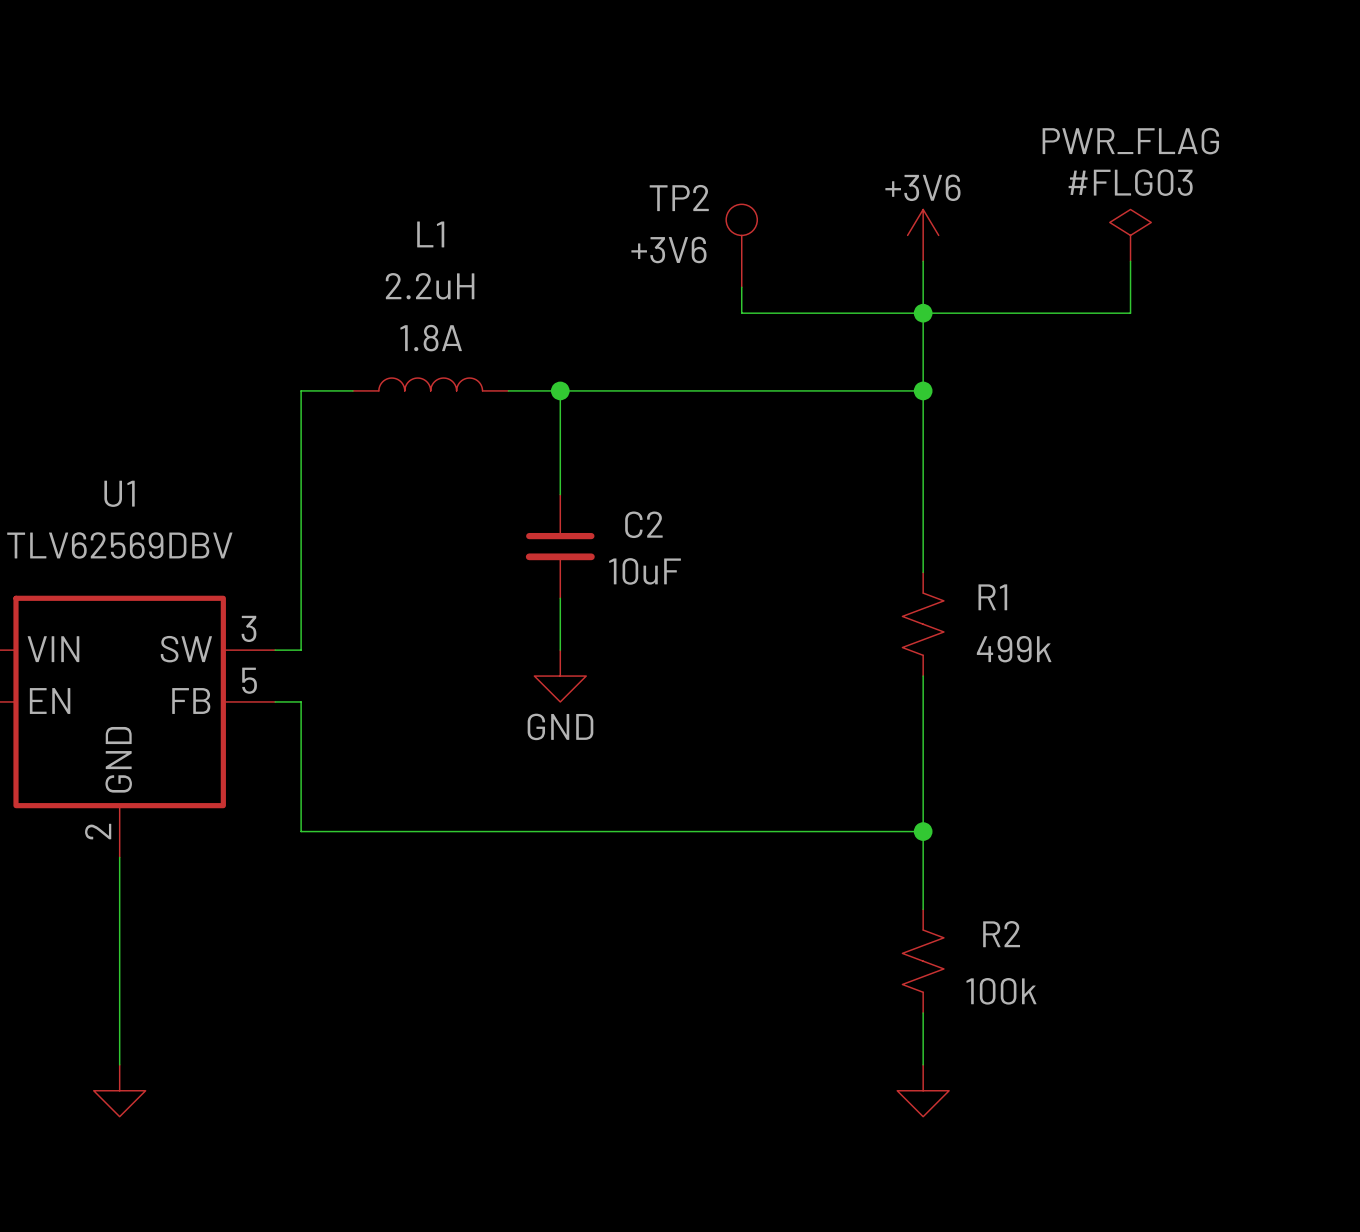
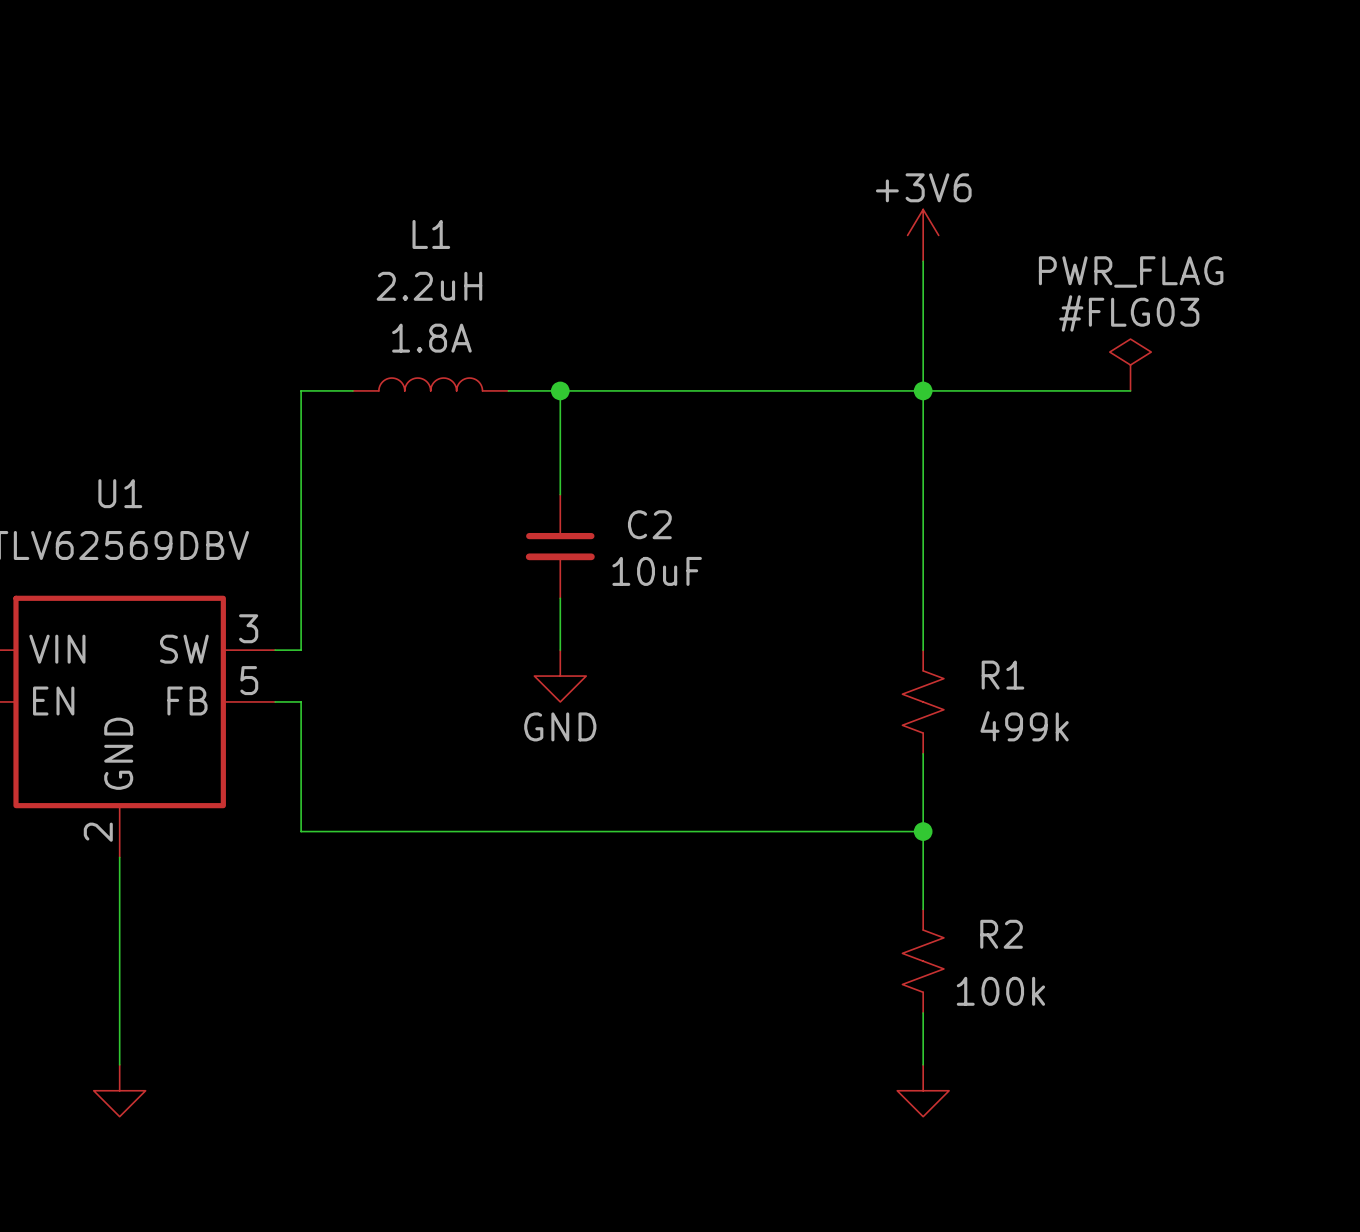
#FLG03 position: PWR_FLAG (1130, 235) -> PWR_FLAG (1130, 365)
TP2: +3V6 (741, 245) -> none
wire: (1130, 261) (1130, 313) (741, 313) (741, 287) -> none
junction: (923, 313) -> none
wire: none -> (923, 390) (1130, 390)
R1 position: (923, 624) -> (923, 701)
wire: (923, 676) (923, 753) -> (923, 572) (923, 650)

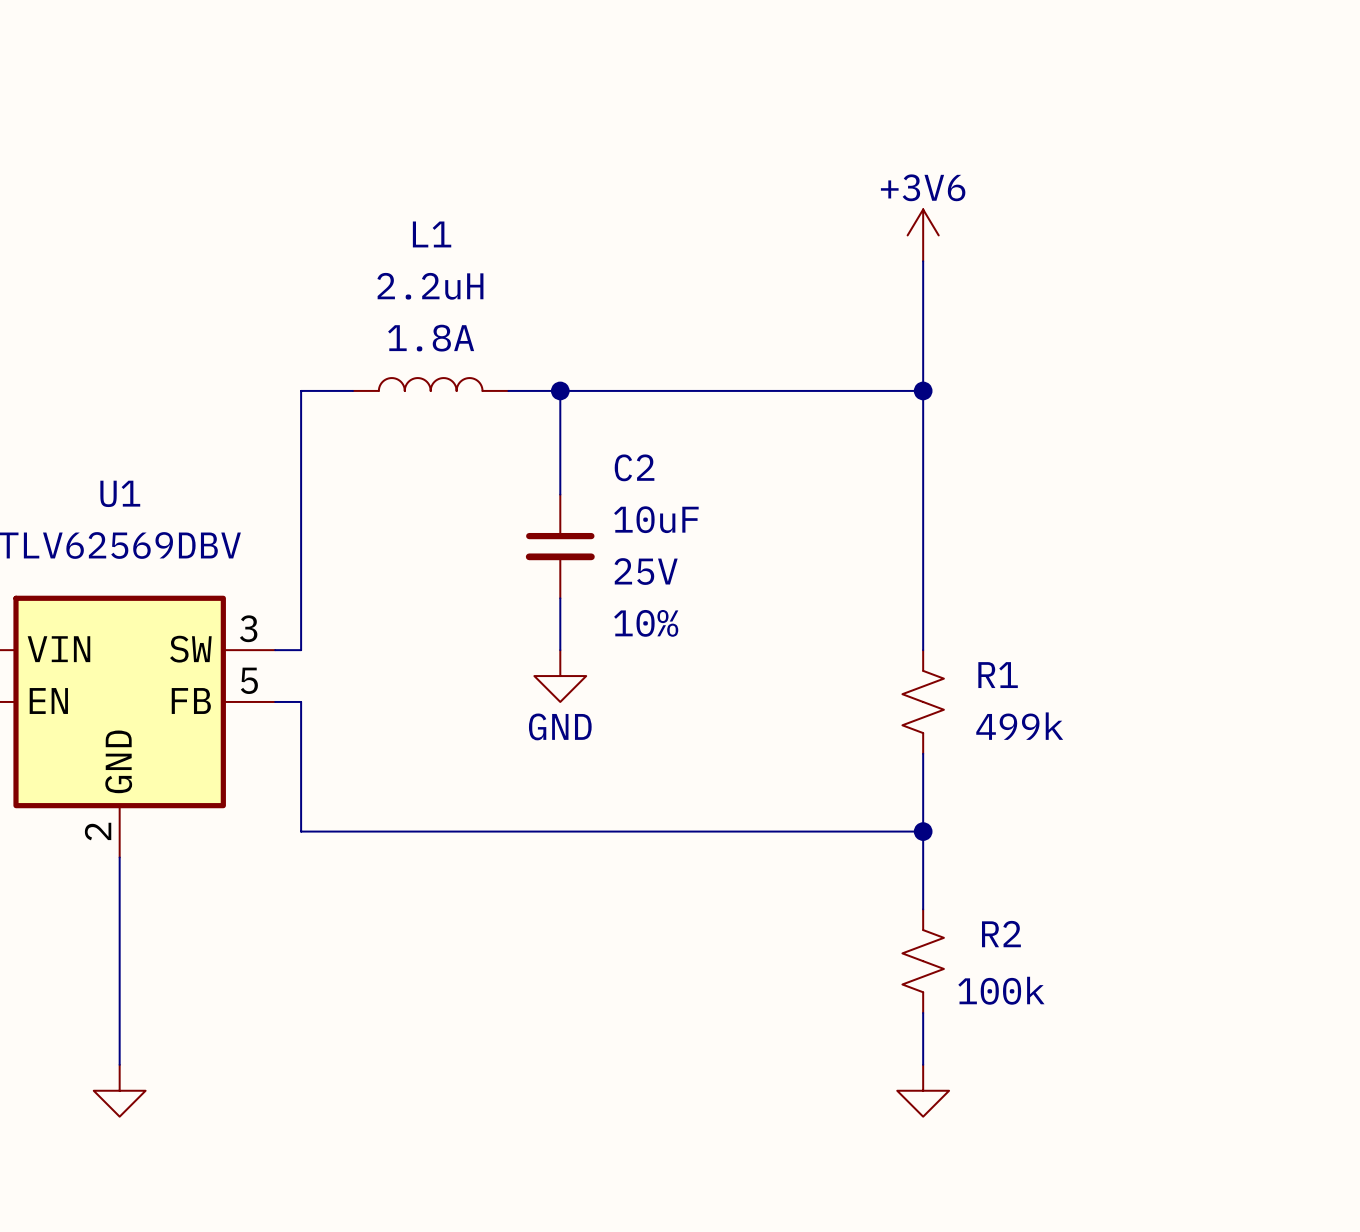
#FLG03: PWR_FLAG (1130, 365) -> none
wire: (923, 390) (1130, 390) -> none
C2 name position: C2 (649, 524) -> C2 (634, 467)
C2 text: none -> 25V (646, 571)
C2 value position: 10uF (657, 571) -> 10uF (656, 519)
C2 text: none -> 10% (646, 623)

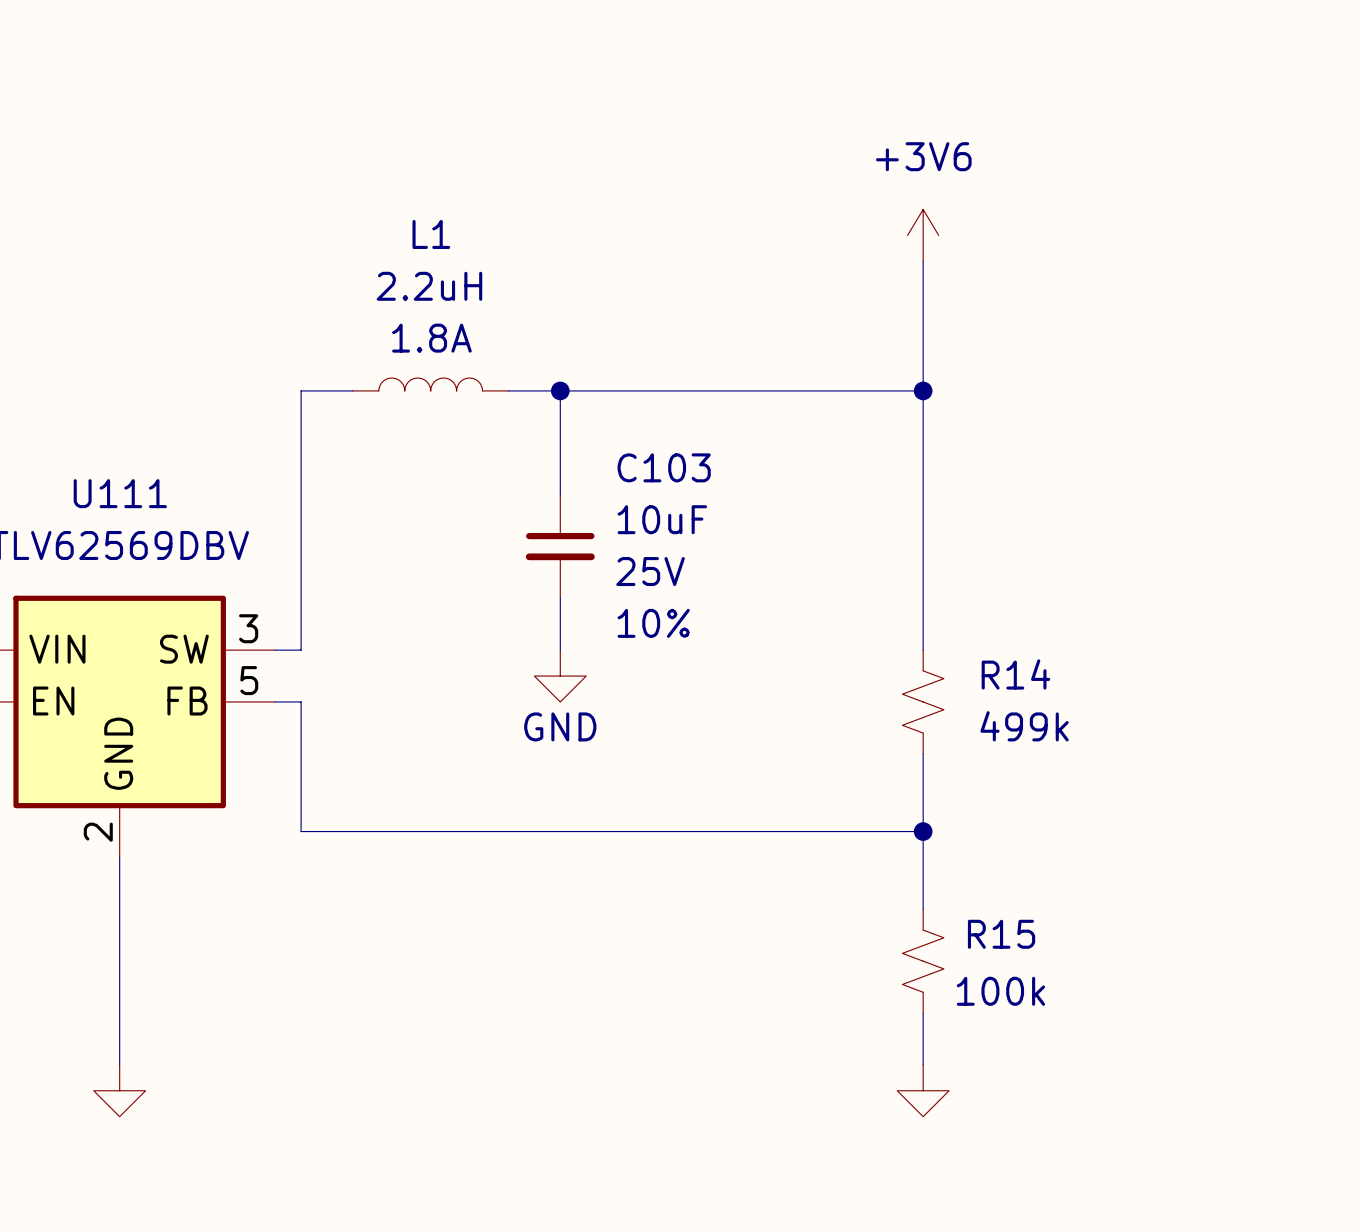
power symbol text position: +3V6 (923, 187) -> +3V6 (923, 156)
C2 name: C2 (634, 467) -> C103 (664, 467)
U1 name: U1 (120, 493) -> U111 (120, 493)
R1 name: R1 (998, 675) -> R14 (1015, 674)
R2 name: R2 (1001, 934) -> R15 (1001, 934)

